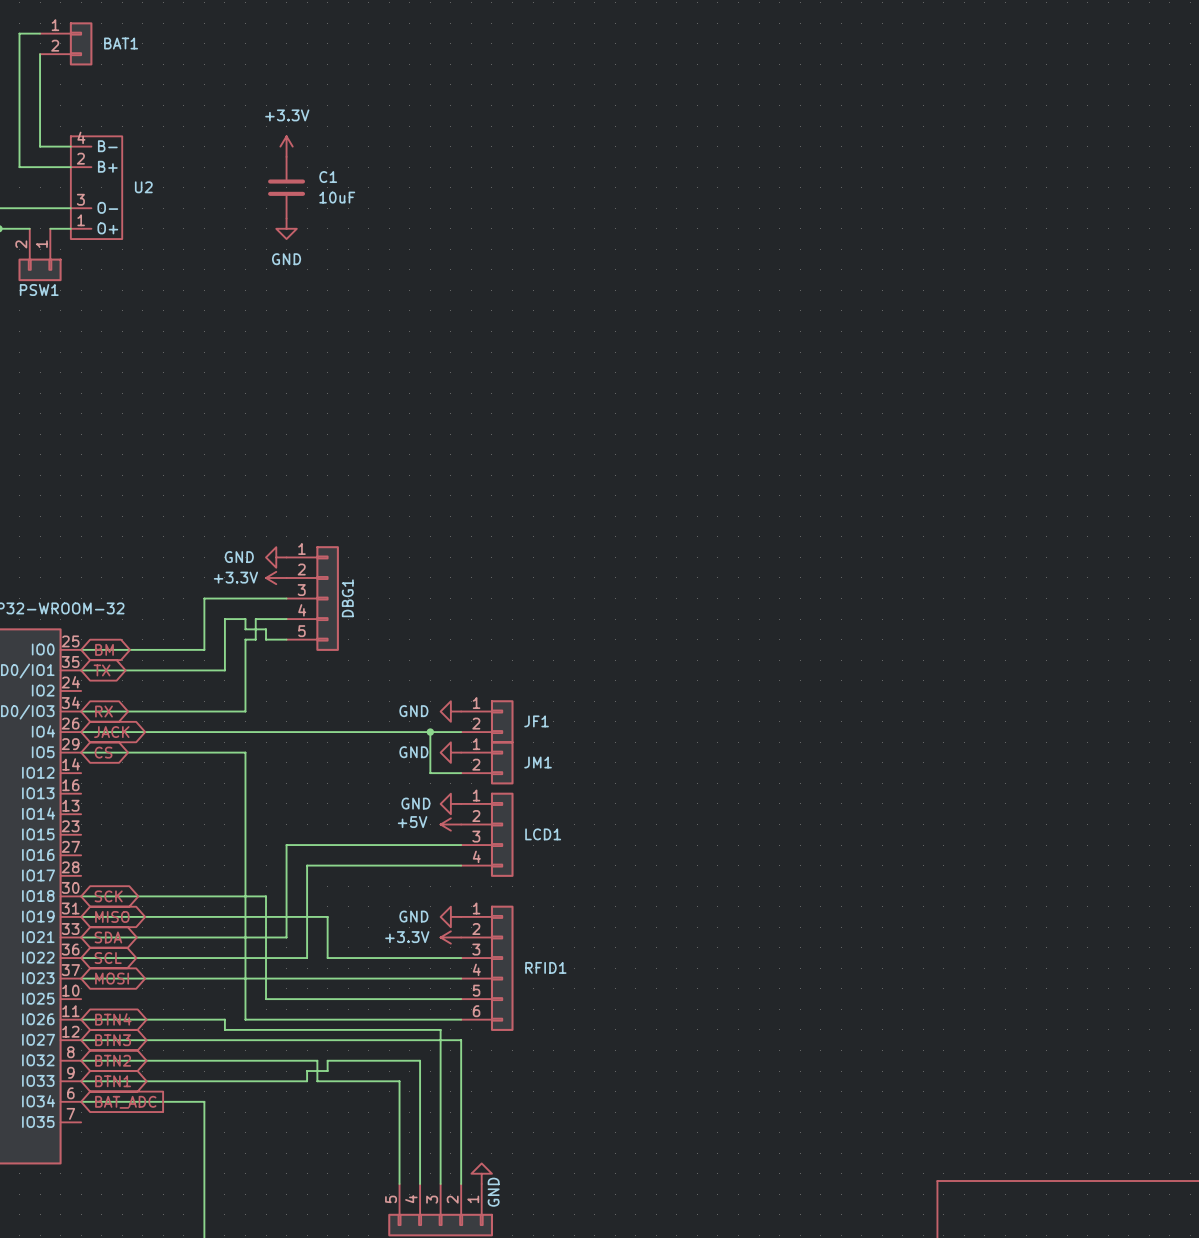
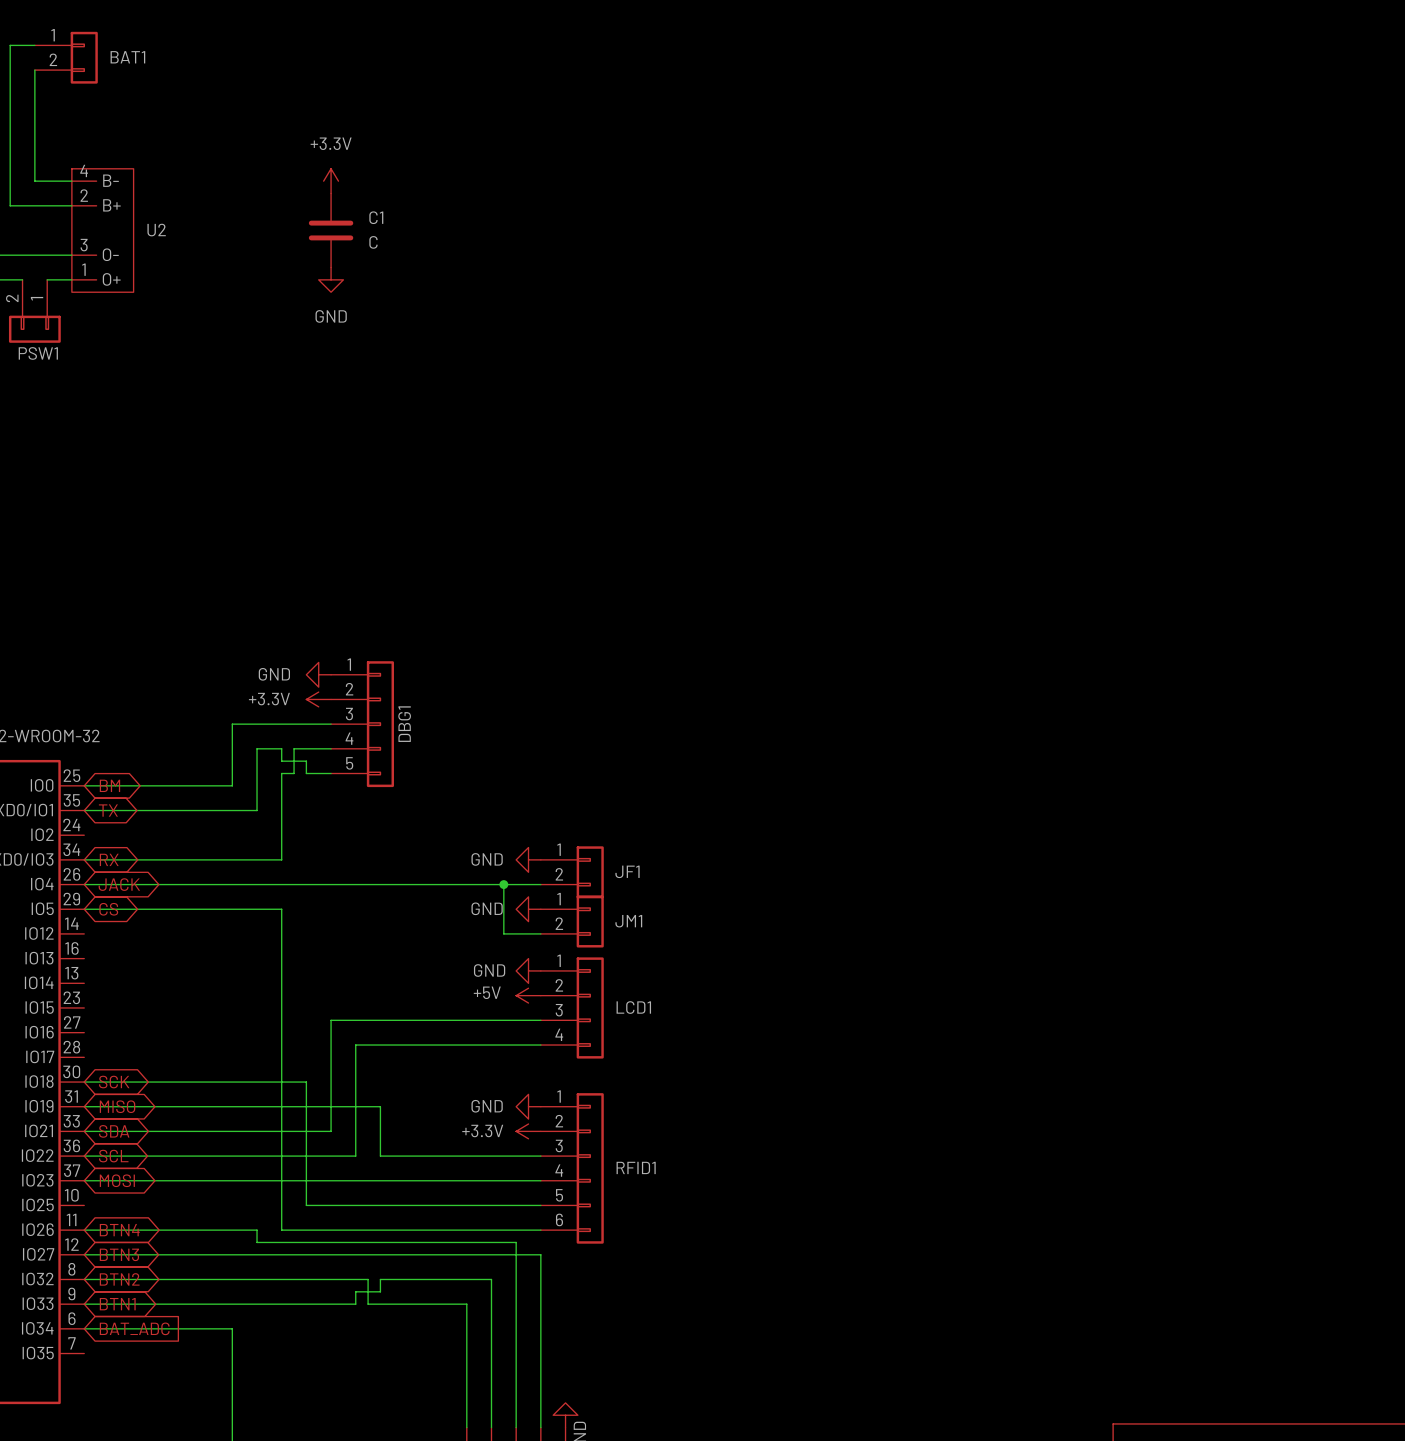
C1 value: 10uF (337, 197) -> C (373, 242)

